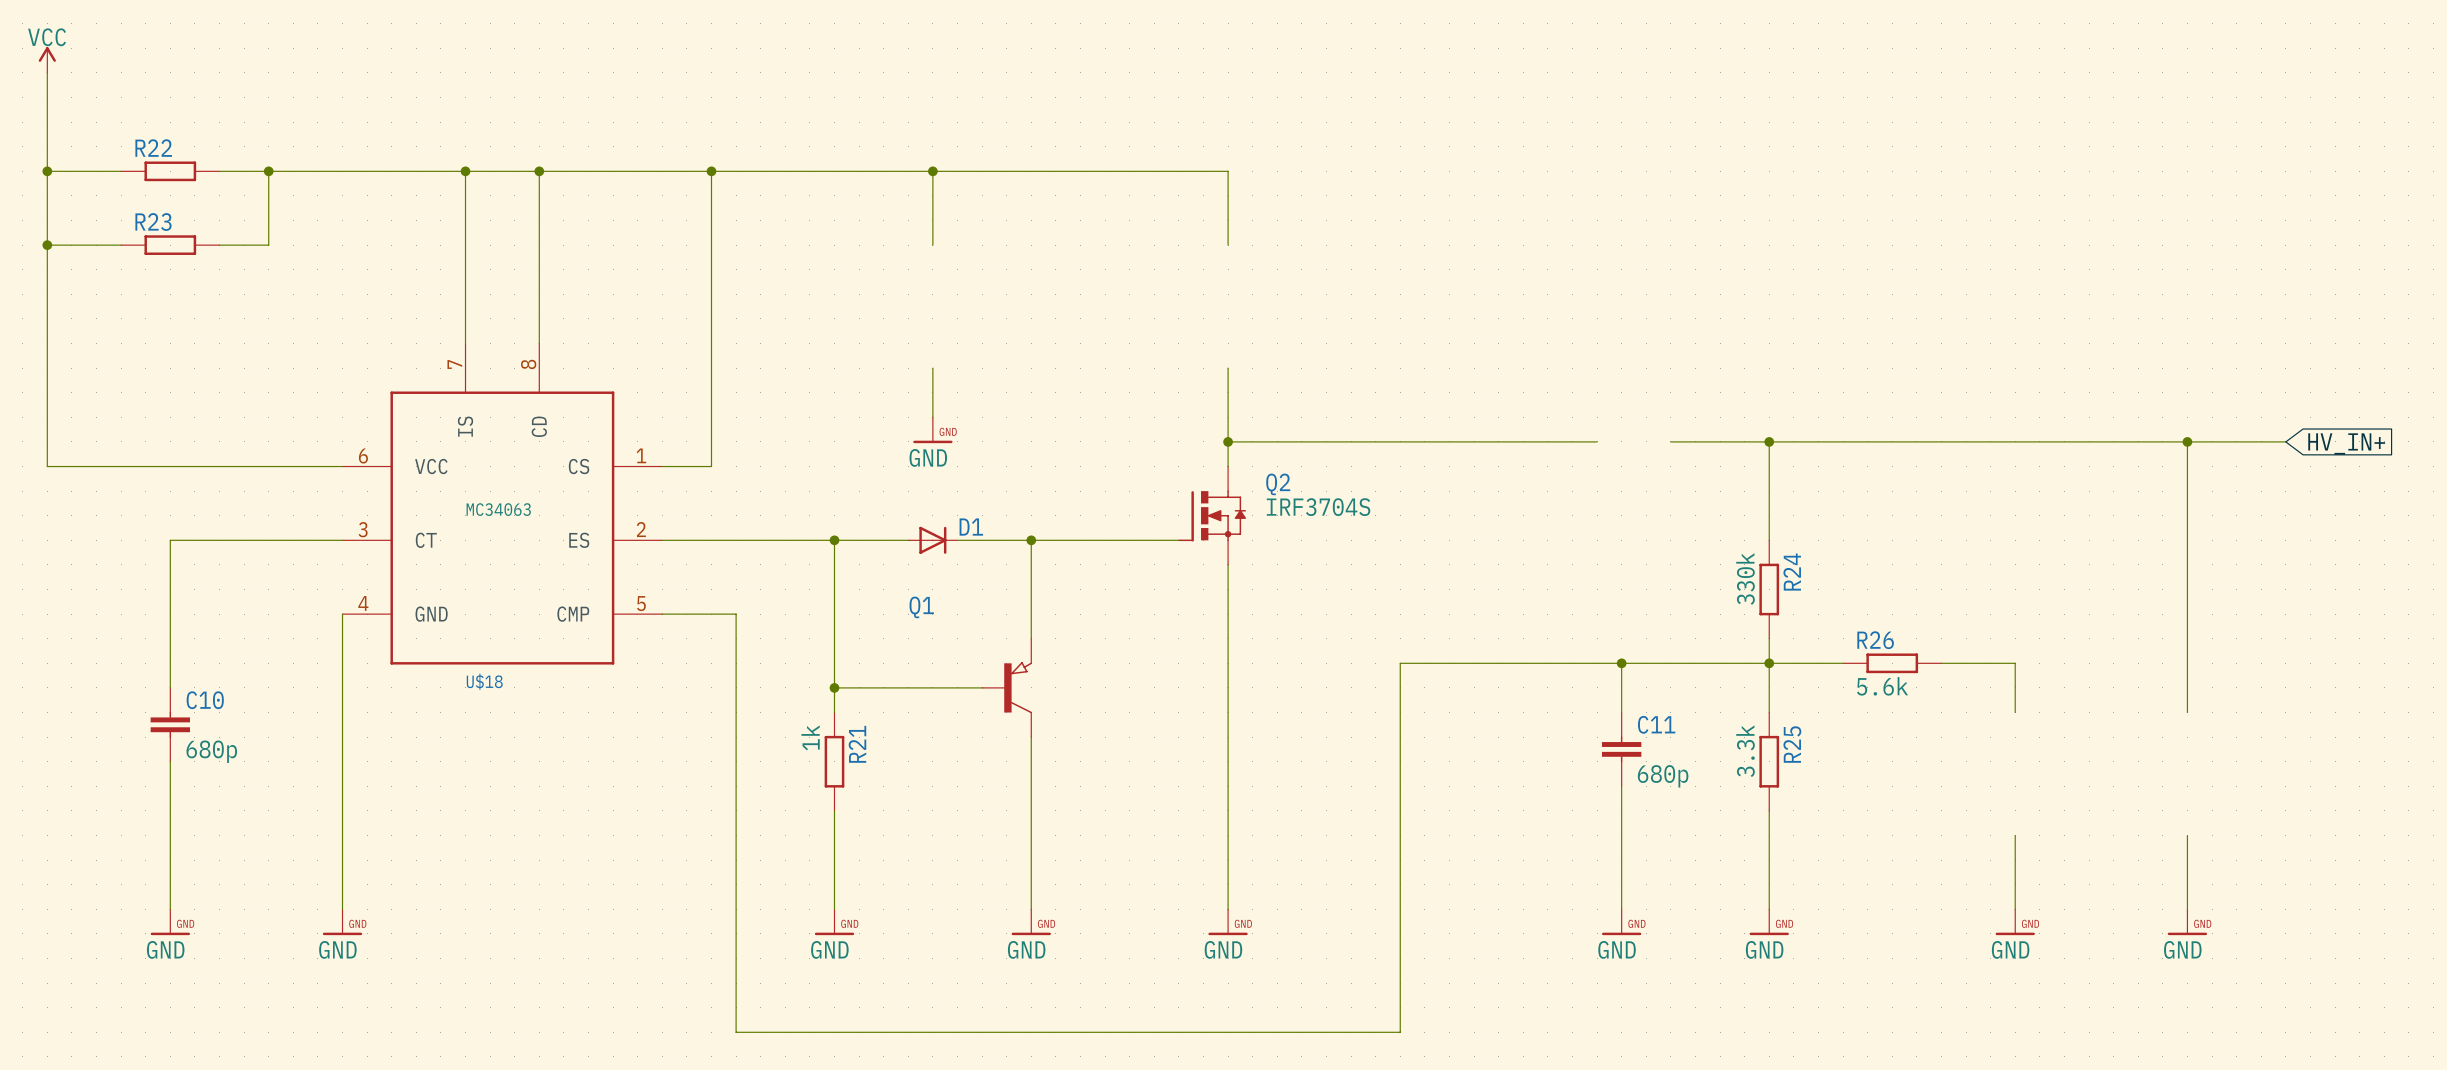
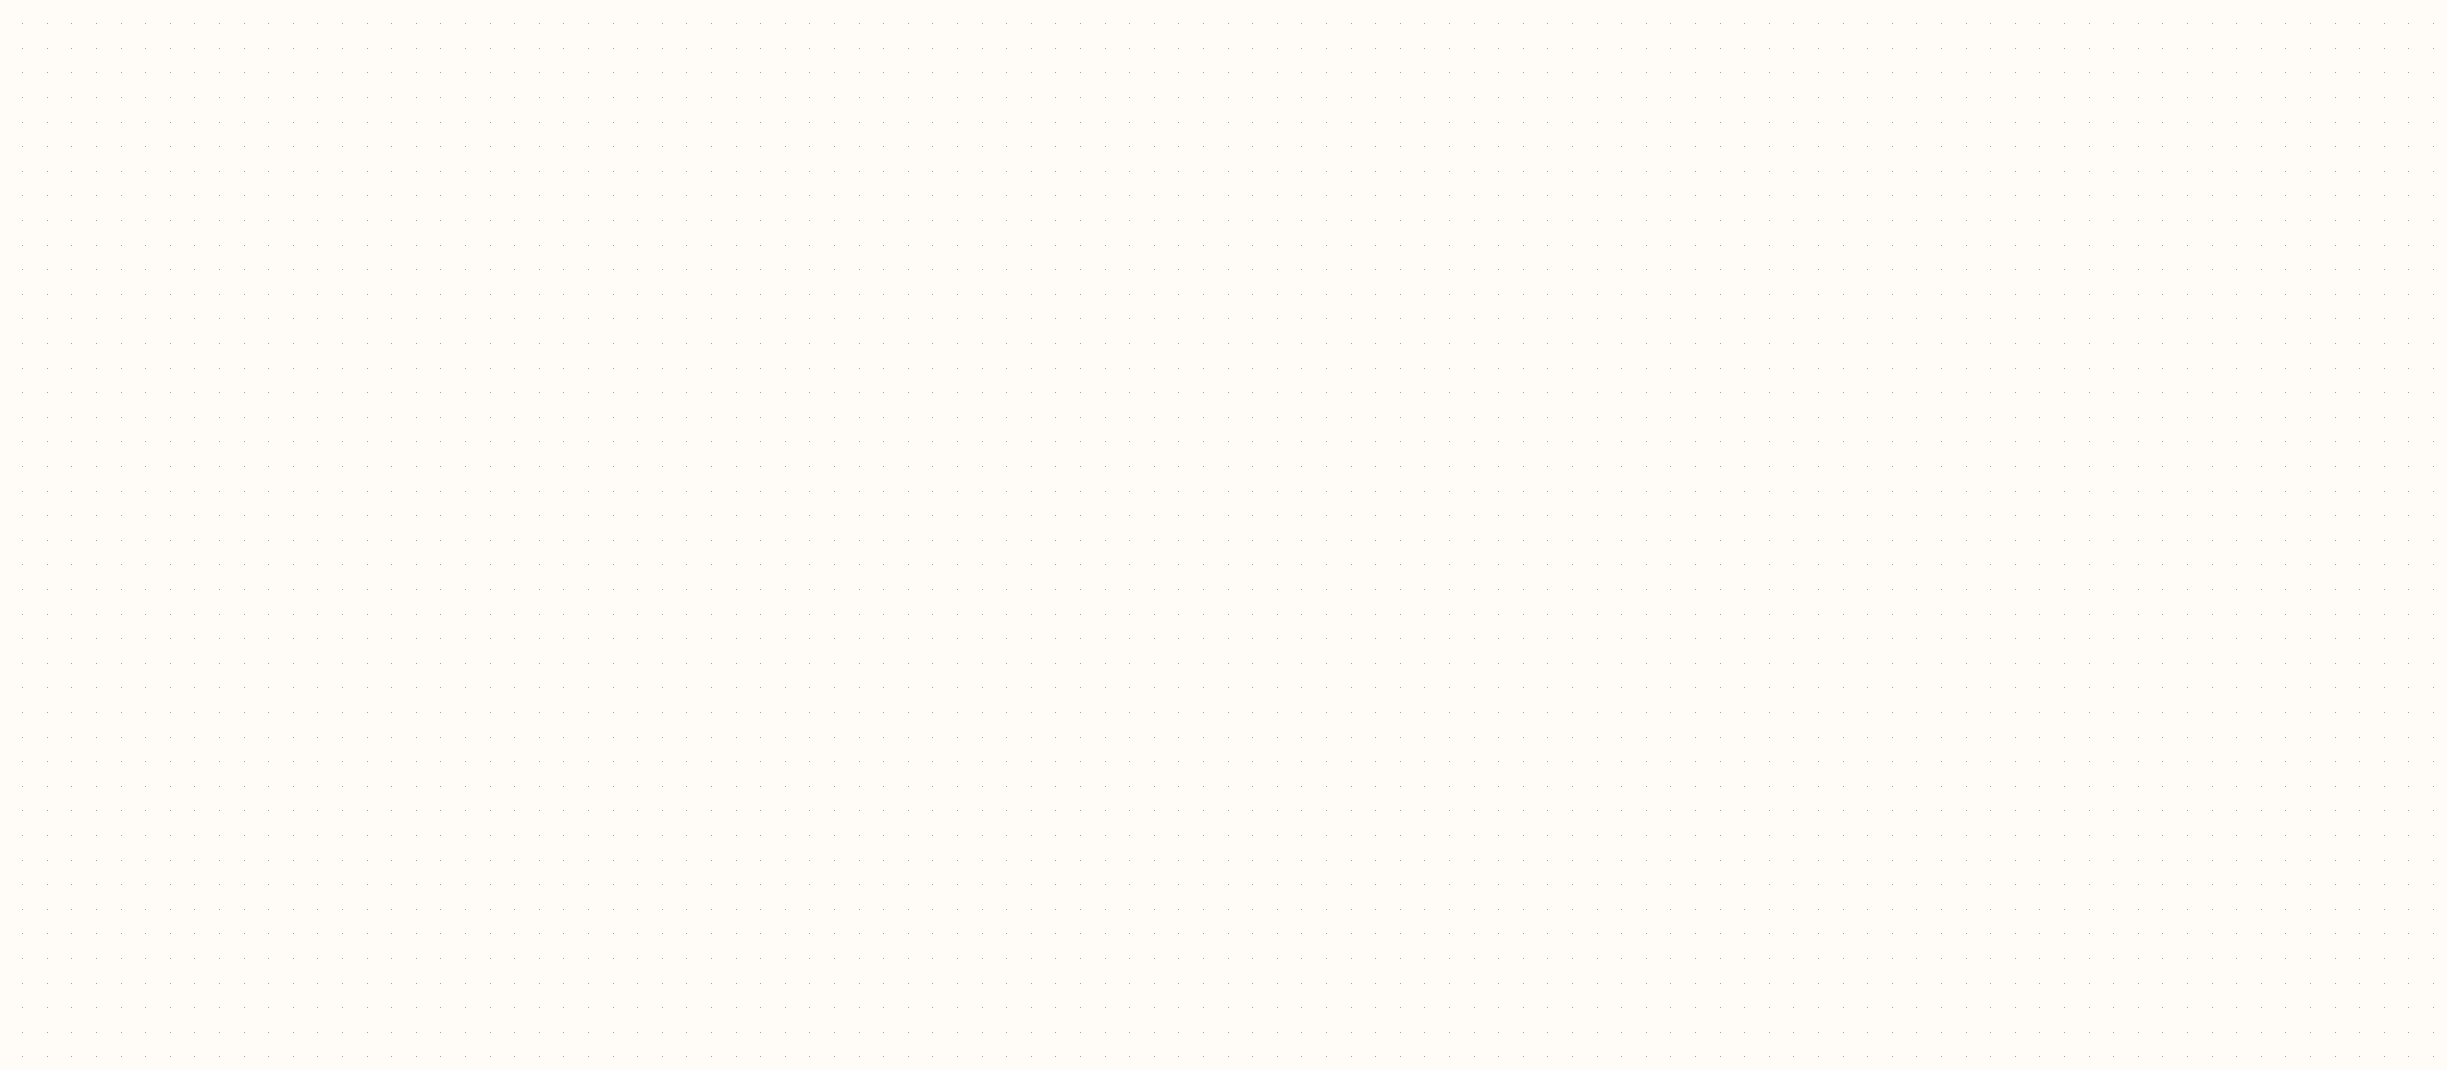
power symbol: VCC (47, 60) -> none
wire: (47, 72) (47, 466) (342, 466) -> none
wire: (47, 171) (121, 171) -> none
junction: (47, 171) -> none
R22: (170, 171) -> none
wire: (219, 171) (1228, 171) (1228, 245) -> none
wire: (268, 171) (268, 245) (219, 245) -> none
junction: (268, 171) -> none
wire: (465, 171) (465, 343) -> none
junction: (465, 171) -> none
wire: (539, 171) (539, 343) -> none
junction: (539, 171) -> none
wire: (711, 171) (711, 466) (662, 466) -> none
junction: (711, 171) -> none
wire: (932, 171) (932, 245) -> none
junction: (932, 171) -> none
wire: (47, 245) (121, 245) -> none
junction: (47, 245) -> none
R23: (170, 245) -> none
wire: (932, 368) (932, 417) -> none
wire: (1228, 368) (1228, 466) -> none
power symbol: GND (932, 430) -> none
wire: (1228, 441) (1597, 441) -> none
junction: (1228, 441) -> none
wire: (1670, 441) (2285, 441) -> none
wire: (1769, 441) (1769, 540) -> none
junction: (1769, 441) -> none
wire: (2187, 441) (2187, 712) -> none
junction: (2187, 441) -> none
global label: HV_IN+ (2346, 444) -> none
U$18: (502, 504) -> none
Q2: IRF3704S (1212, 515) -> none
wire: (342, 540) (170, 540) (170, 687) -> none
wire: (662, 540) (908, 540) -> none
wire: (834, 540) (834, 712) -> none
junction: (834, 540) -> none
D1: (932, 540) -> none
wire: (957, 540) (1178, 540) -> none
wire: (1031, 540) (1031, 638) -> none
junction: (1031, 540) -> none
wire: (1228, 564) (1228, 909) -> none
R24: 330k (1769, 589) -> none
wire: (342, 614) (342, 909) -> none
wire: (662, 614) (736, 614) (736, 1032) (1400, 1032) (1400, 663) (1843, 663) -> none
wire: (1769, 638) (1769, 712) -> none
wire: (1621, 663) (1621, 712) -> none
junction: (1621, 663) -> none
junction: (1769, 663) -> none
R26: 5.6k (1892, 663) -> none
wire: (1941, 663) (2015, 663) (2015, 712) -> none
wire: (834, 687) (982, 687) -> none
junction: (834, 687) -> none
Q1: (1007, 687) -> none
C10: 680p (170, 724) -> none
wire: (1031, 737) (1031, 909) -> none
C11: 680p (1621, 749) -> none
wire: (170, 761) (170, 909) -> none
R21: 1k (834, 761) -> none
R25: 3.3k (1769, 761) -> none
wire: (1621, 786) (1621, 909) -> none
wire: (834, 810) (834, 909) -> none
wire: (1769, 810) (1769, 909) -> none
wire: (2015, 835) (2015, 909) -> none
wire: (2187, 835) (2187, 909) -> none
power symbol: GND (170, 922) -> none
power symbol: GND (342, 922) -> none
power symbol: GND (834, 922) -> none
power symbol: GND (1031, 922) -> none
power symbol: GND (1228, 922) -> none
power symbol: GND (1621, 922) -> none
power symbol: GND (1769, 922) -> none
power symbol: GND (2015, 922) -> none
power symbol: GND (2187, 922) -> none

